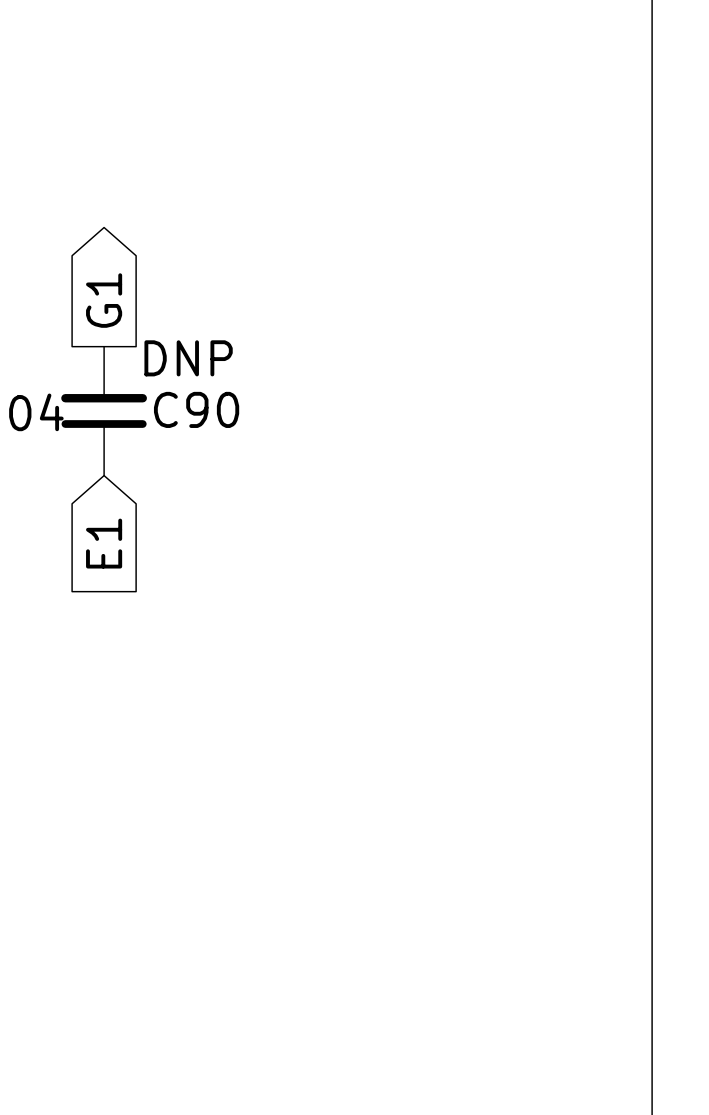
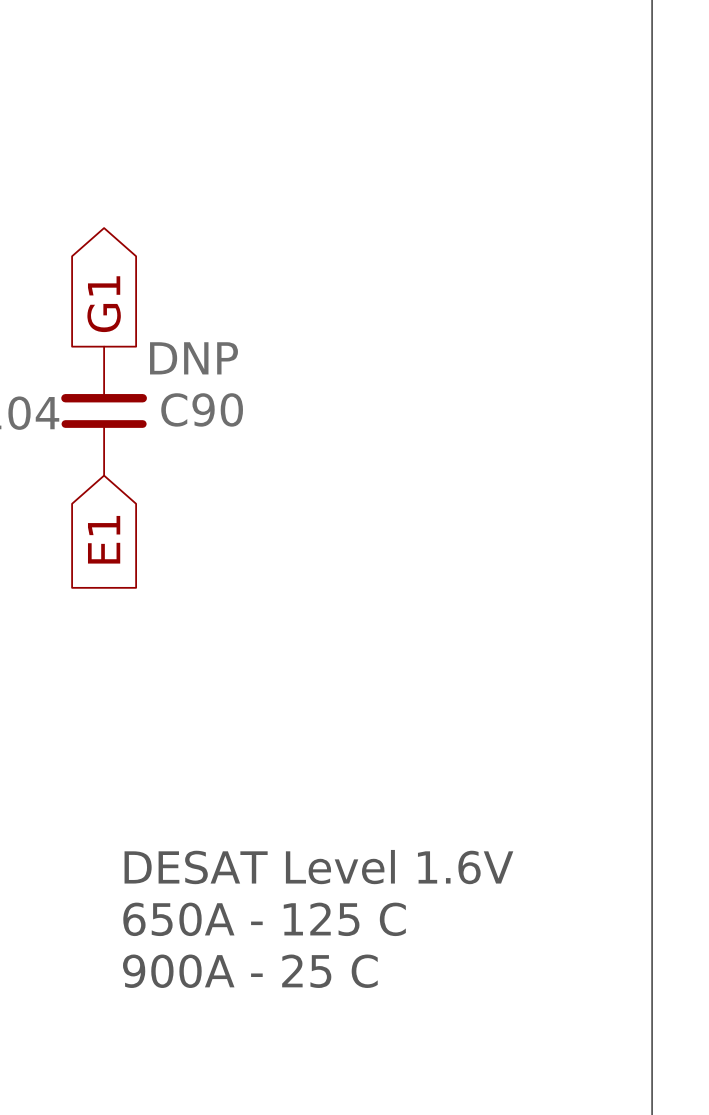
text: none -> DESAT Level 1.6V (318, 867)
text: none -> 650A - 125 C (264, 919)
text: none -> 900A - 25 C (250, 971)

